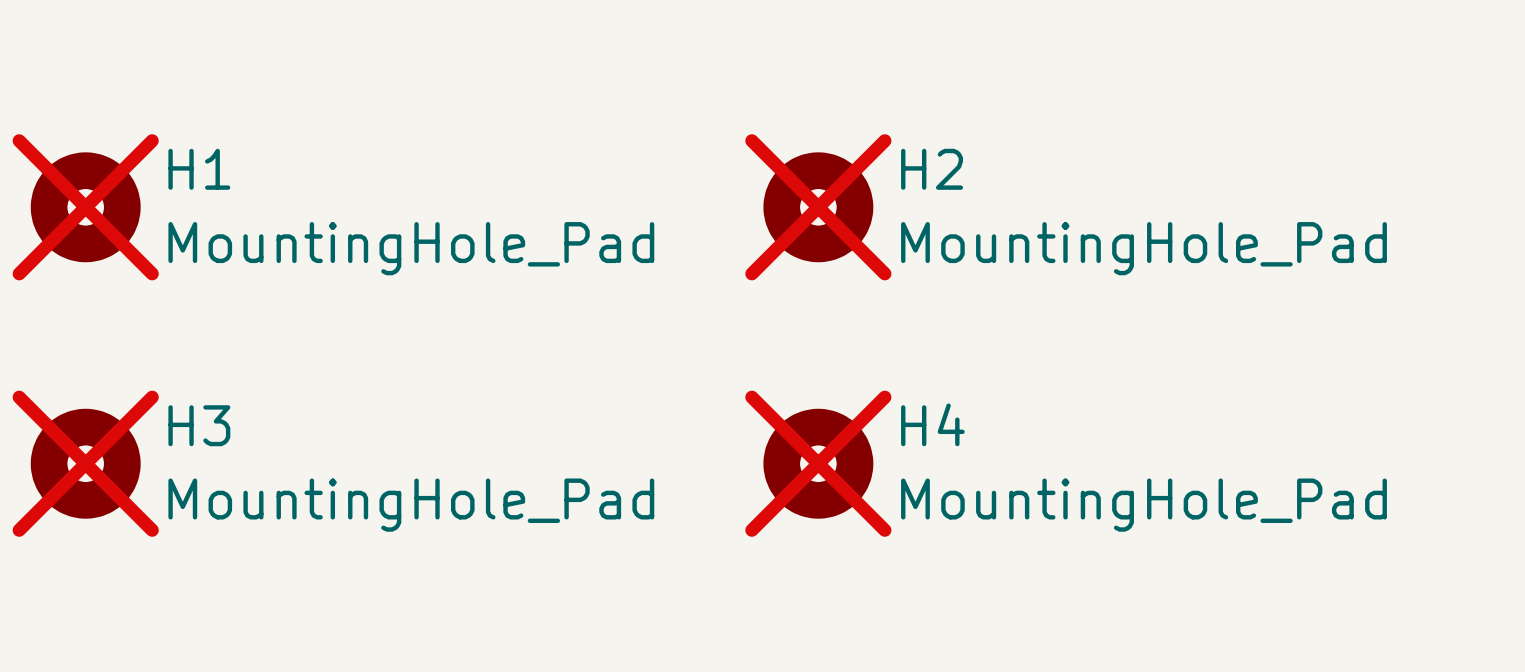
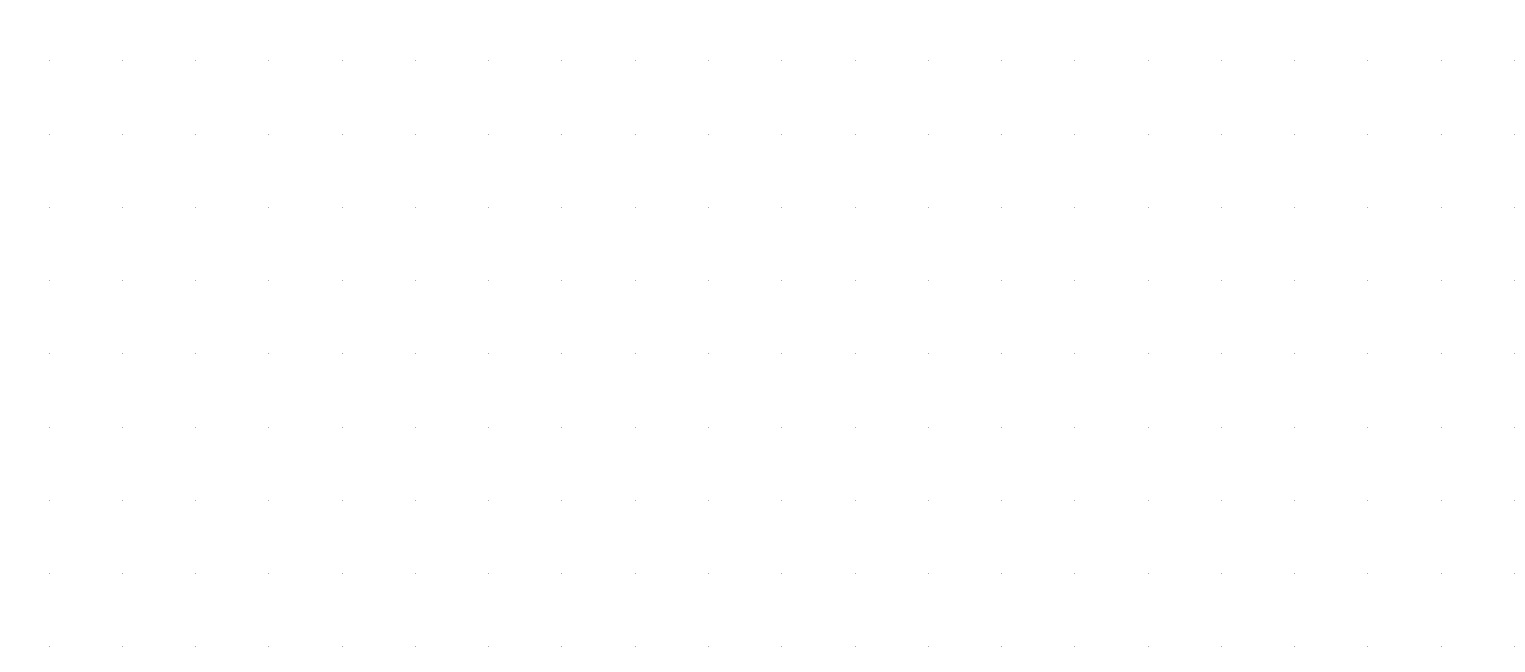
H1: MountingHole_Pad (85, 207) -> none
H2: MountingHole_Pad (818, 207) -> none
H3: MountingHole_Pad (85, 463) -> none
H4: MountingHole_Pad (818, 463) -> none

